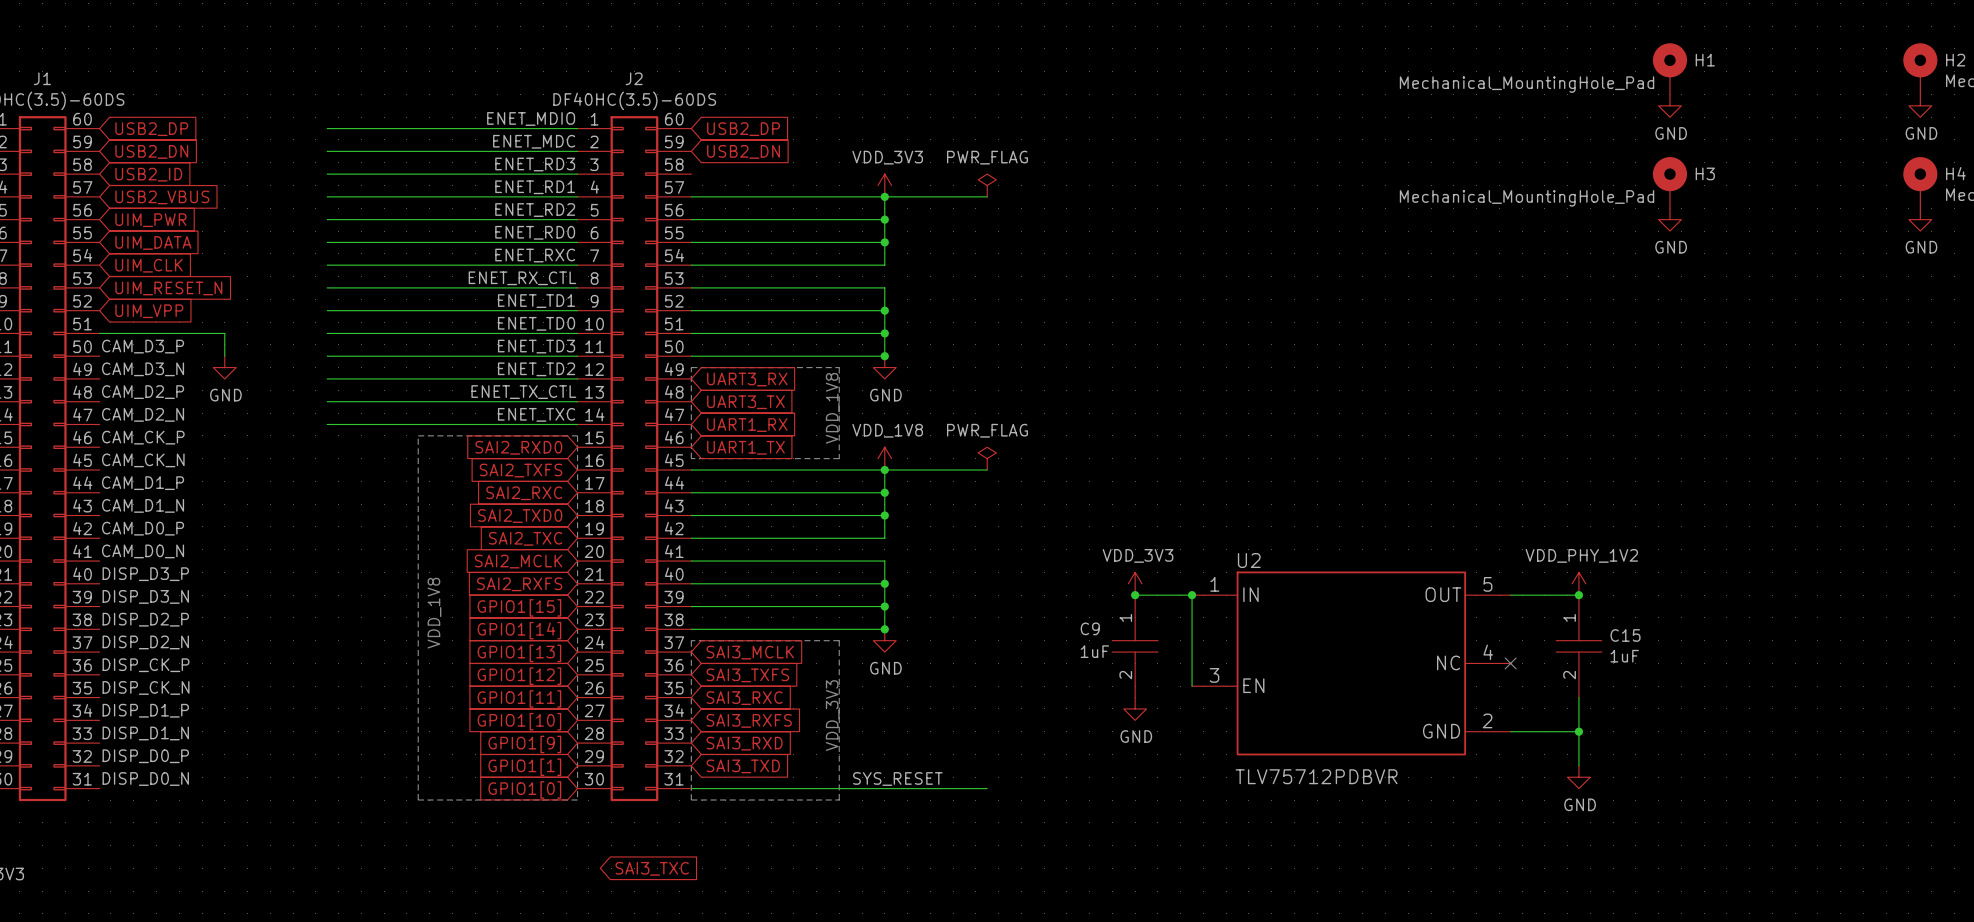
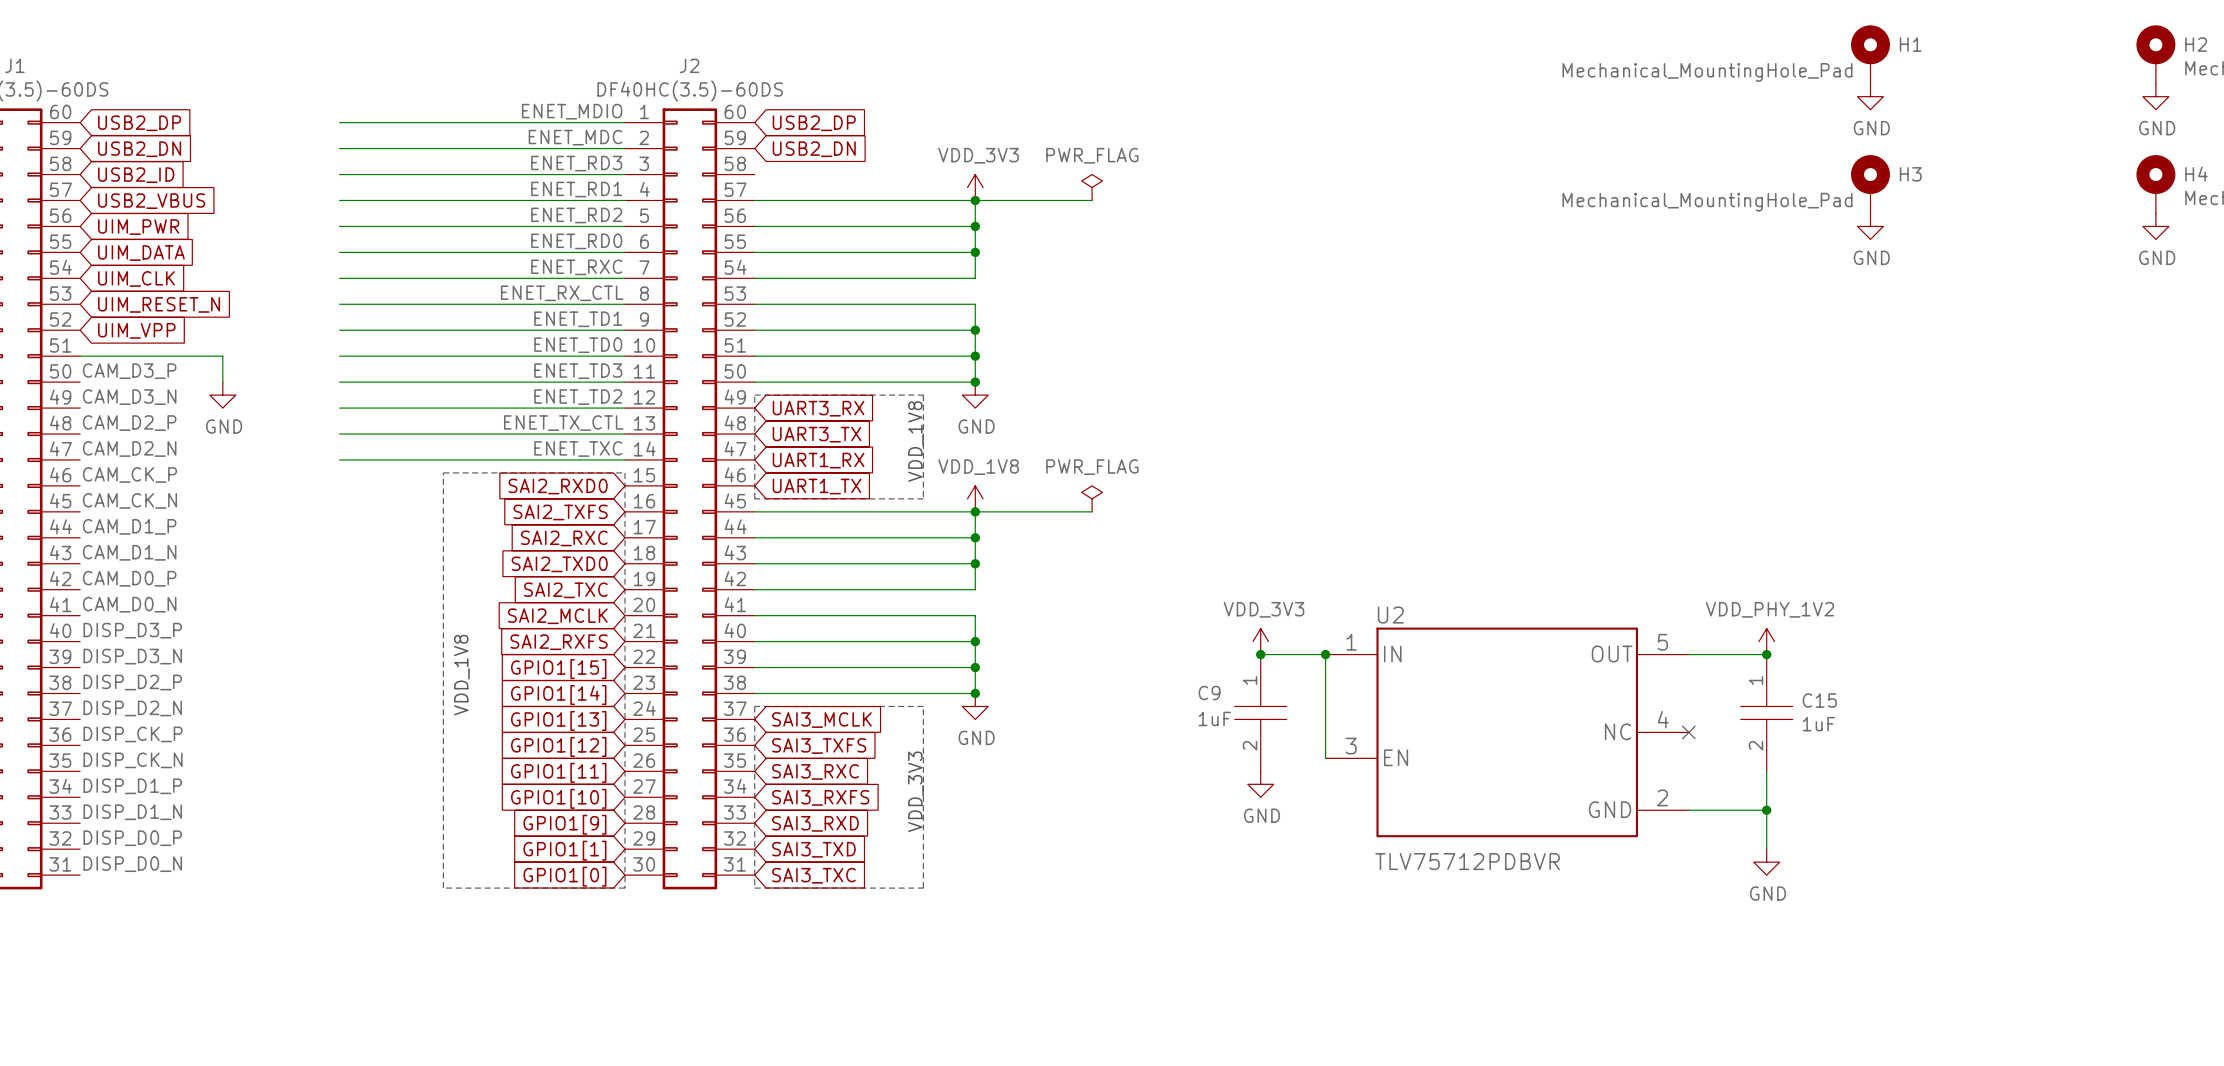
label: SYS_RESET (897, 779) -> none
wire: (691, 788) (987, 788) -> none
global label position: SAI3_TXC (652, 868) -> SAI3_TXC (813, 875)

